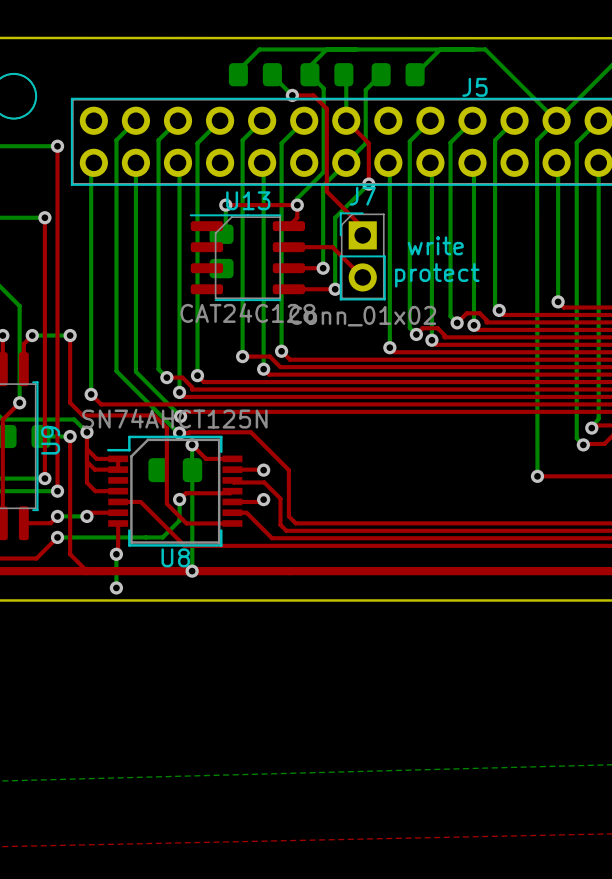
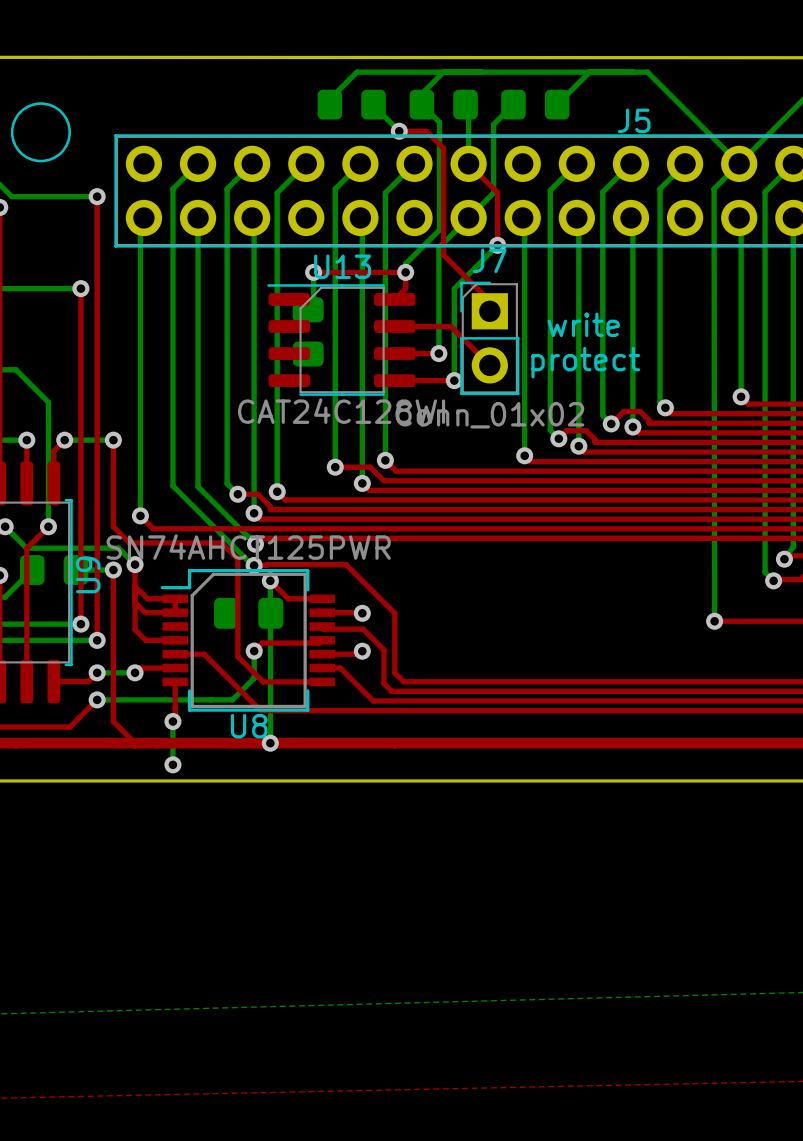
U13 value: CAT24C128 (247, 313) -> CAT24C128WI (341, 411)
U8 value: SN74AHCT125N (174, 418) -> SN74AHCT125PWR (248, 547)

